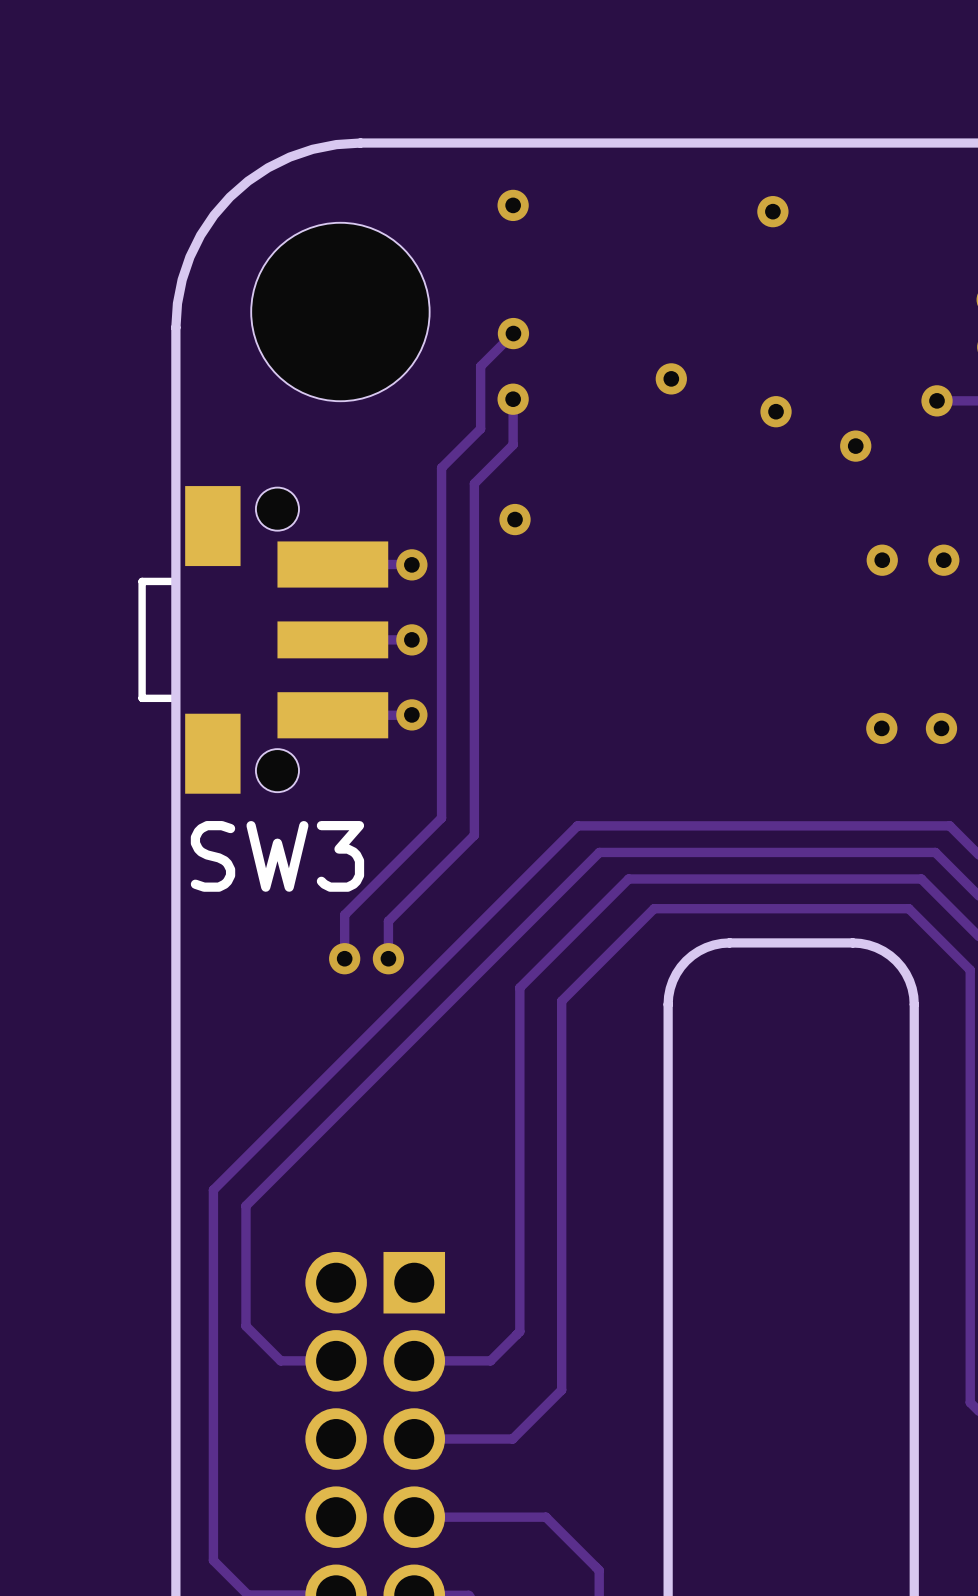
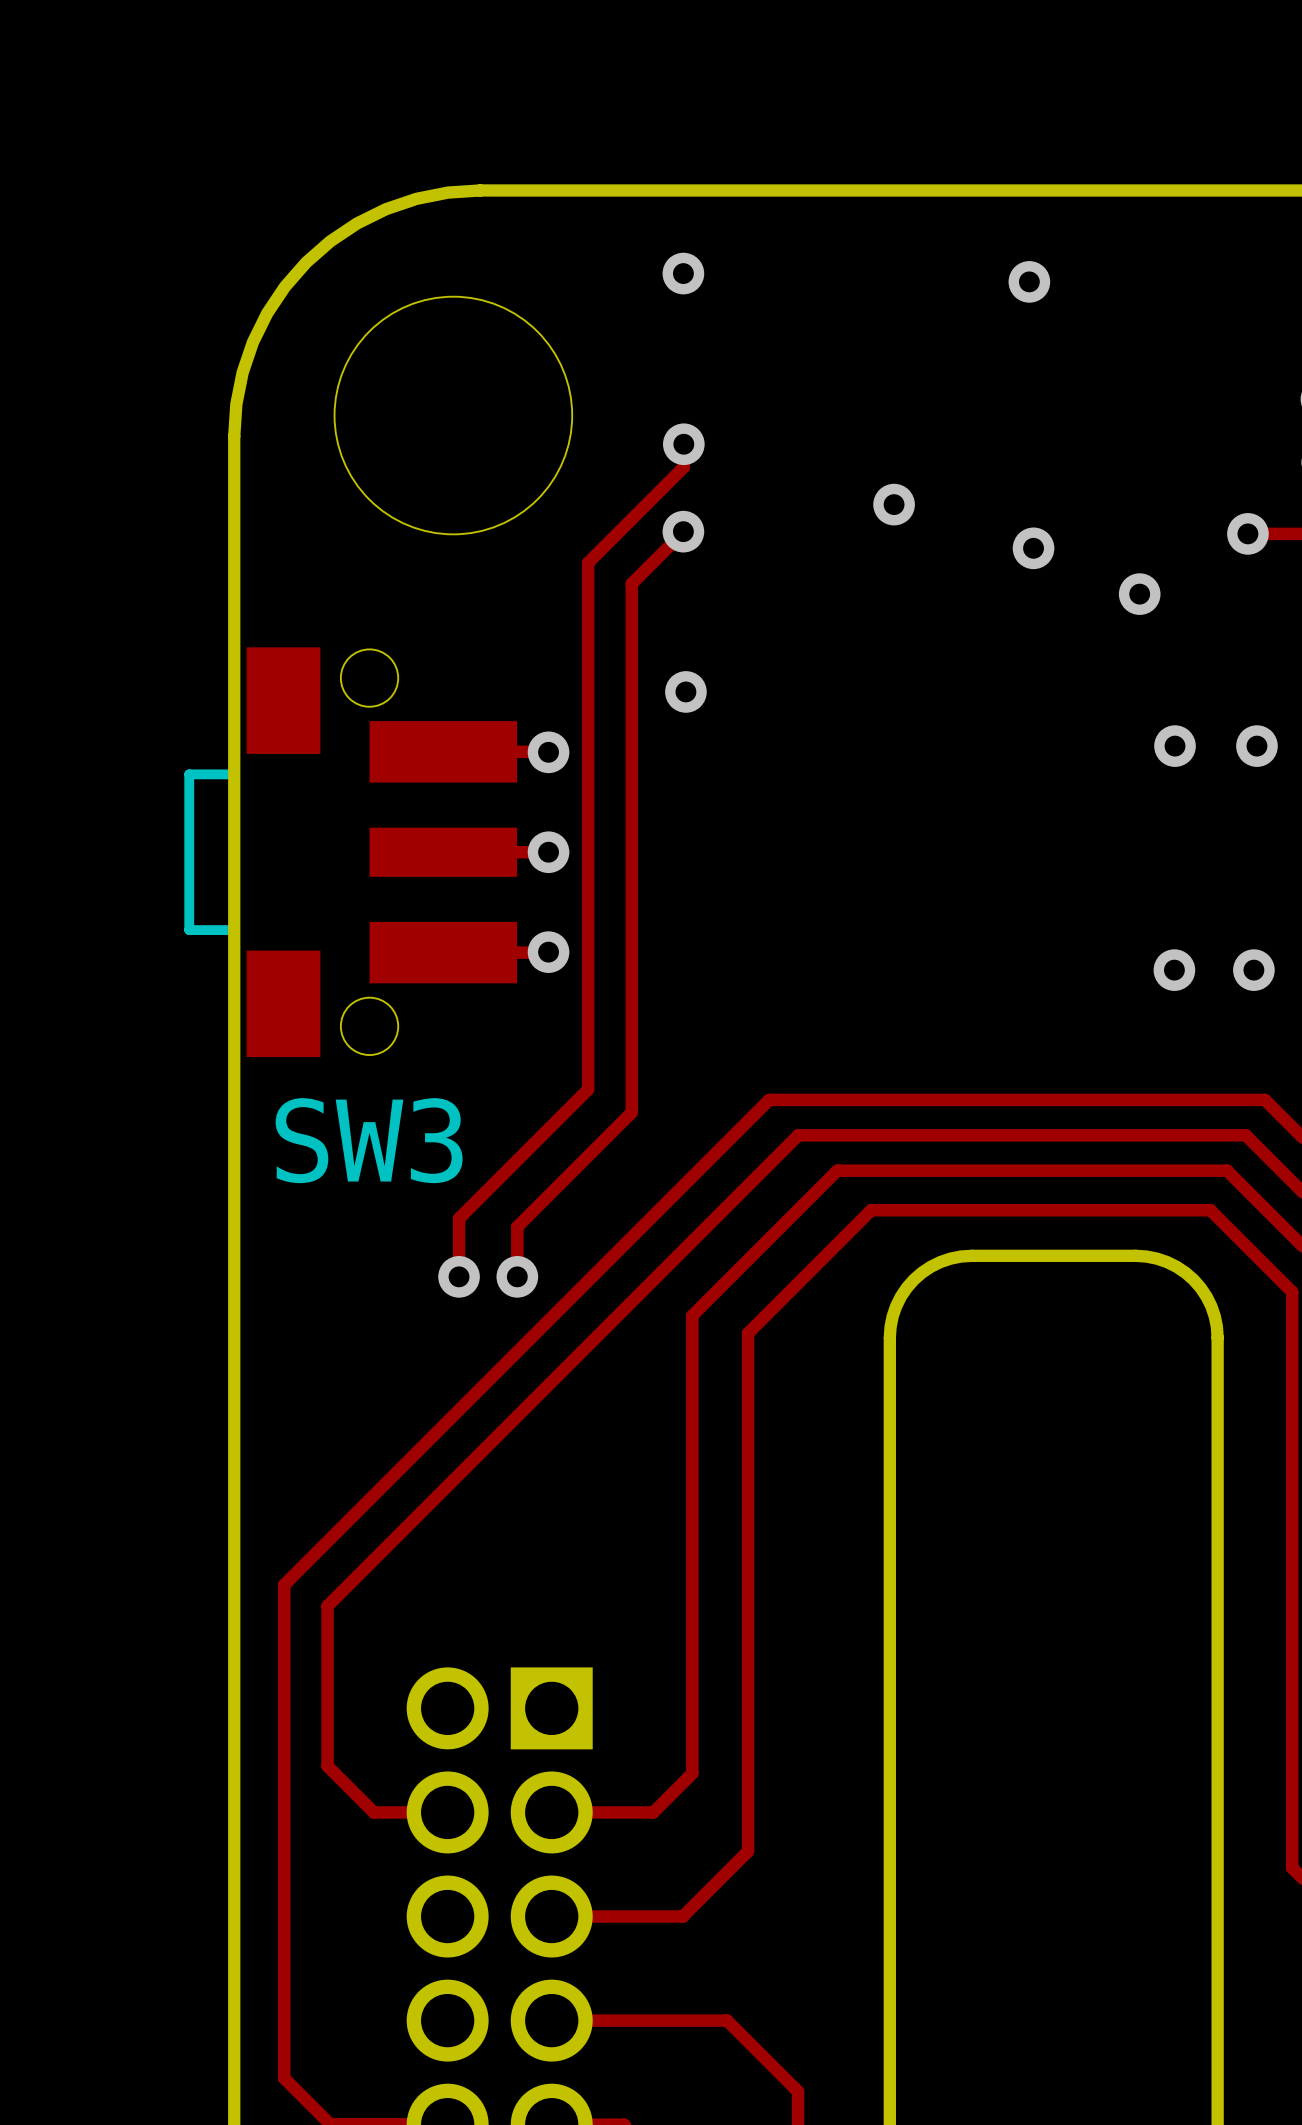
track: (513, 333) (480, 366) (480, 428) (441, 467) -> (683, 444) (683, 467) (588, 562) (588, 623)
track: (513, 399) (513, 444) (474, 483) -> (683, 532) (631, 583) (631, 644)

